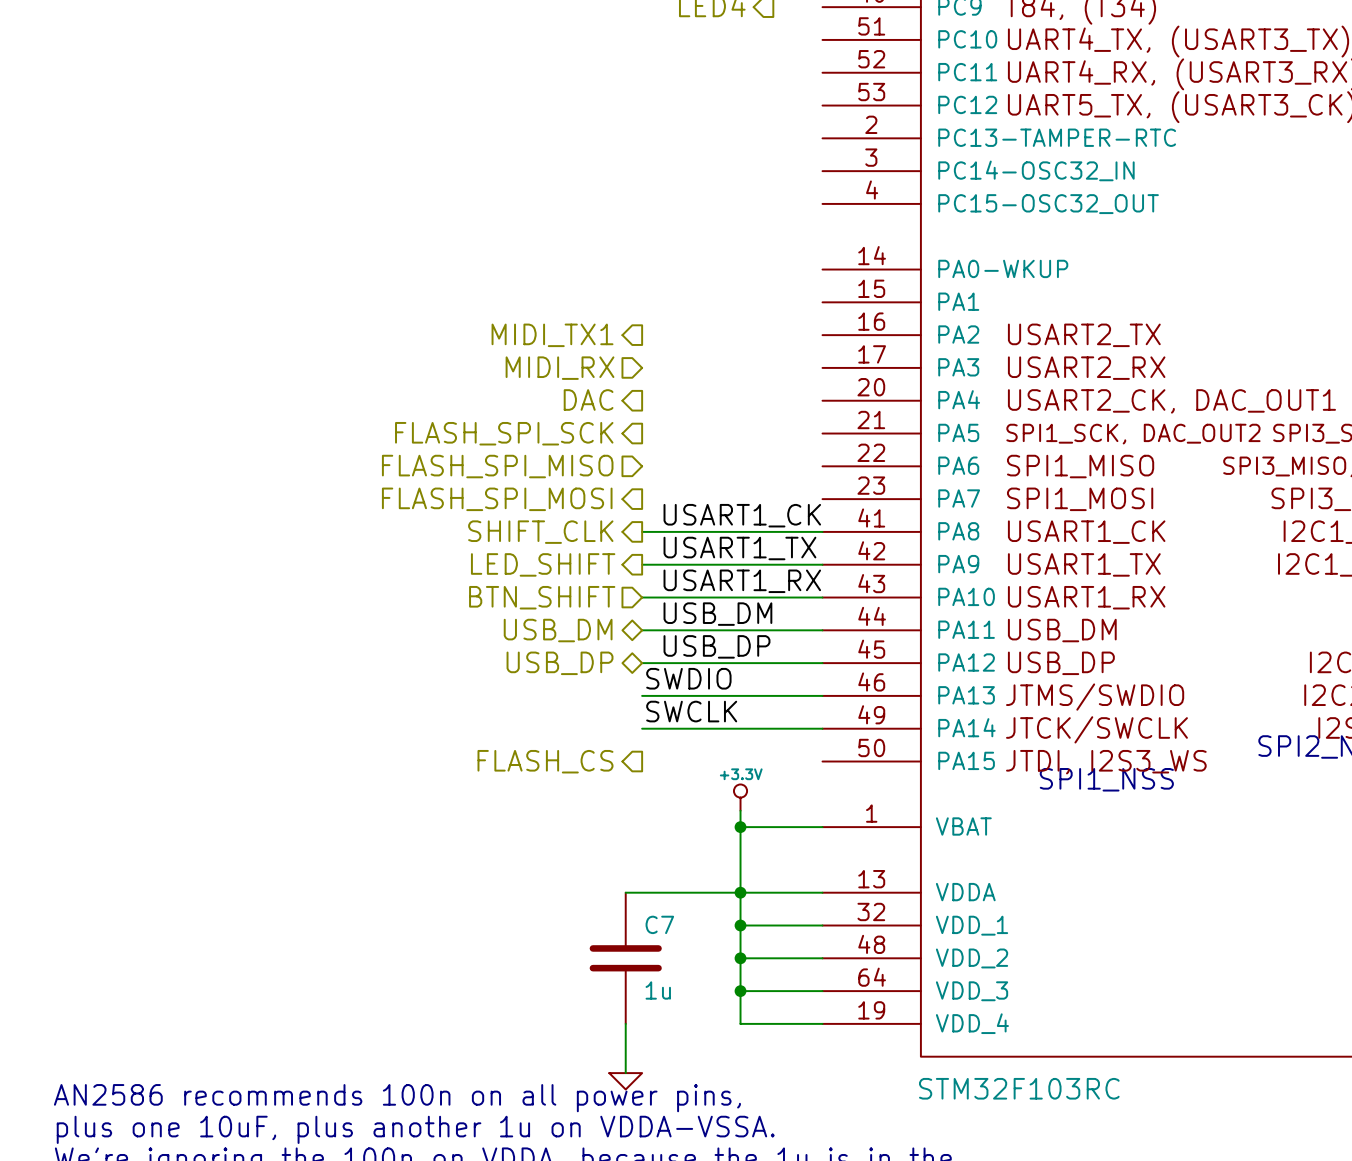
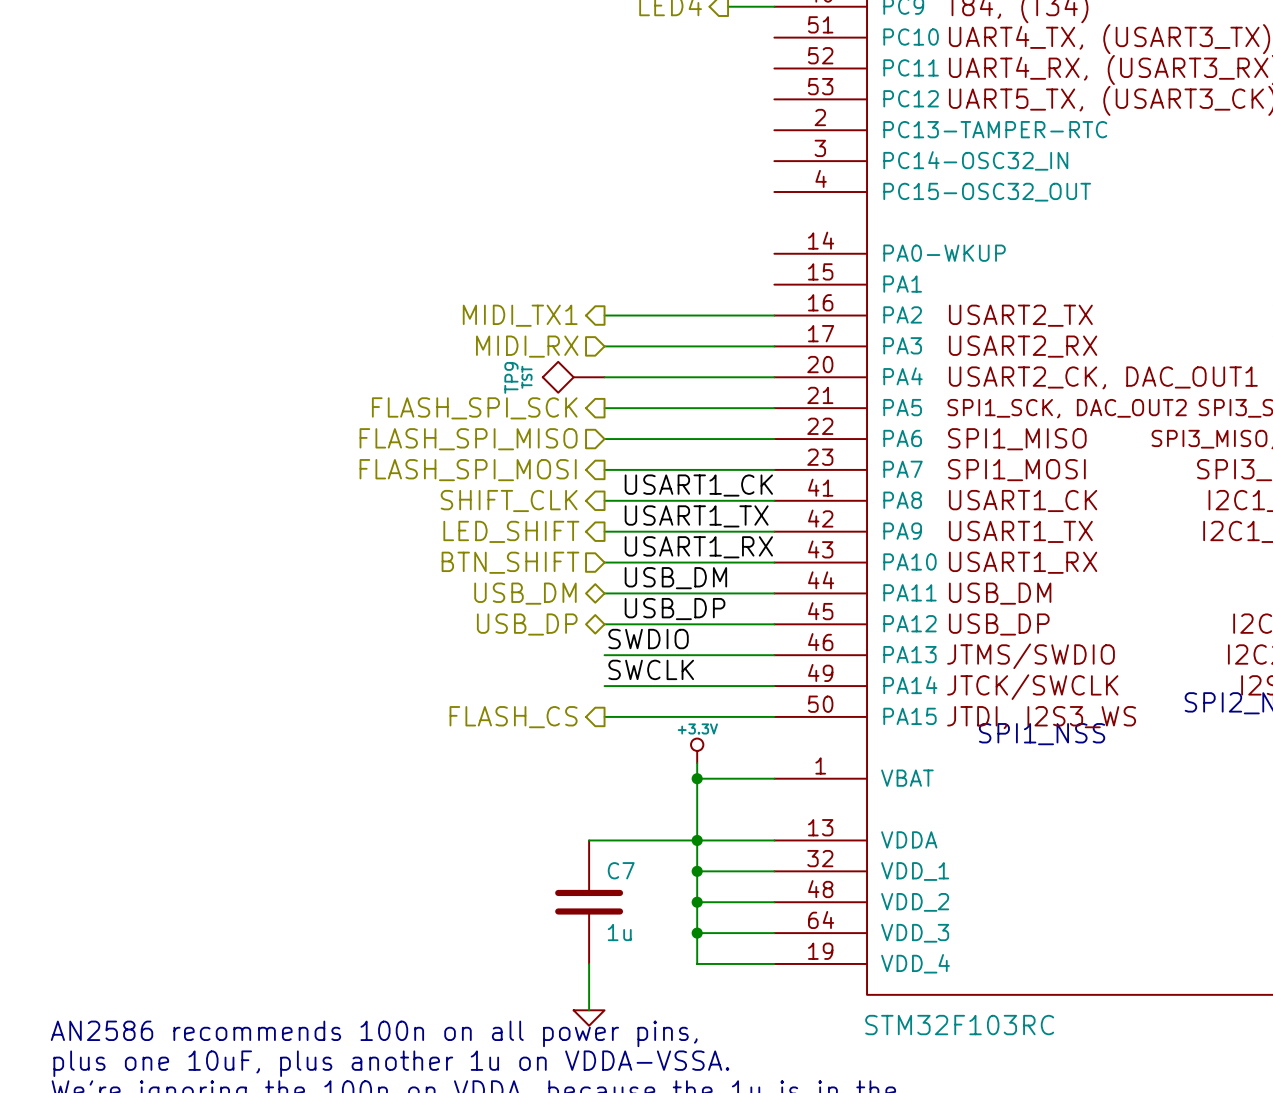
wire: none -> (728, 6) (774, 6)
wire: none -> (604, 315) (774, 315)
wire: none -> (604, 346) (774, 346)
hierarchical label: DAC (588, 399) -> none
TP9: none -> TST (573, 377)
wire: none -> (604, 377) (774, 377)
wire: none -> (604, 408) (774, 408)
wire: none -> (604, 439) (774, 439)
wire: none -> (604, 469) (774, 469)
wire: none -> (604, 716) (774, 716)

